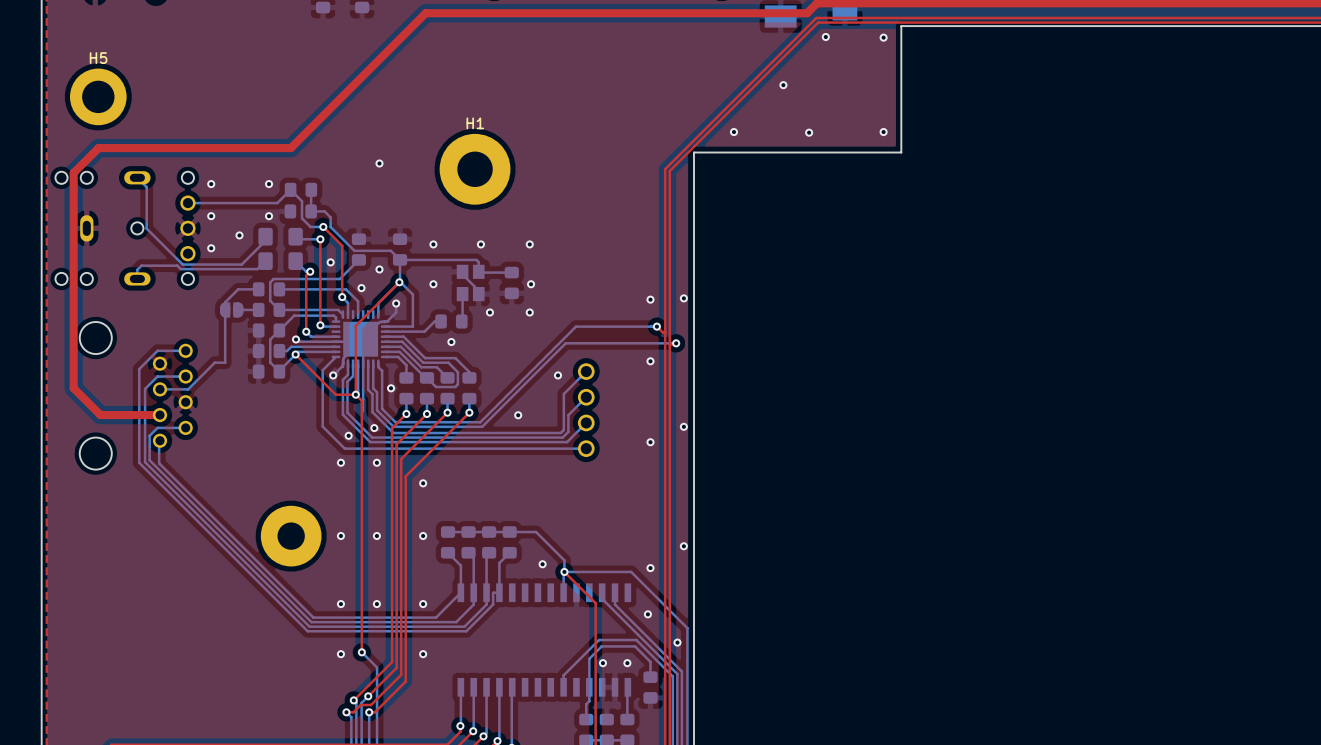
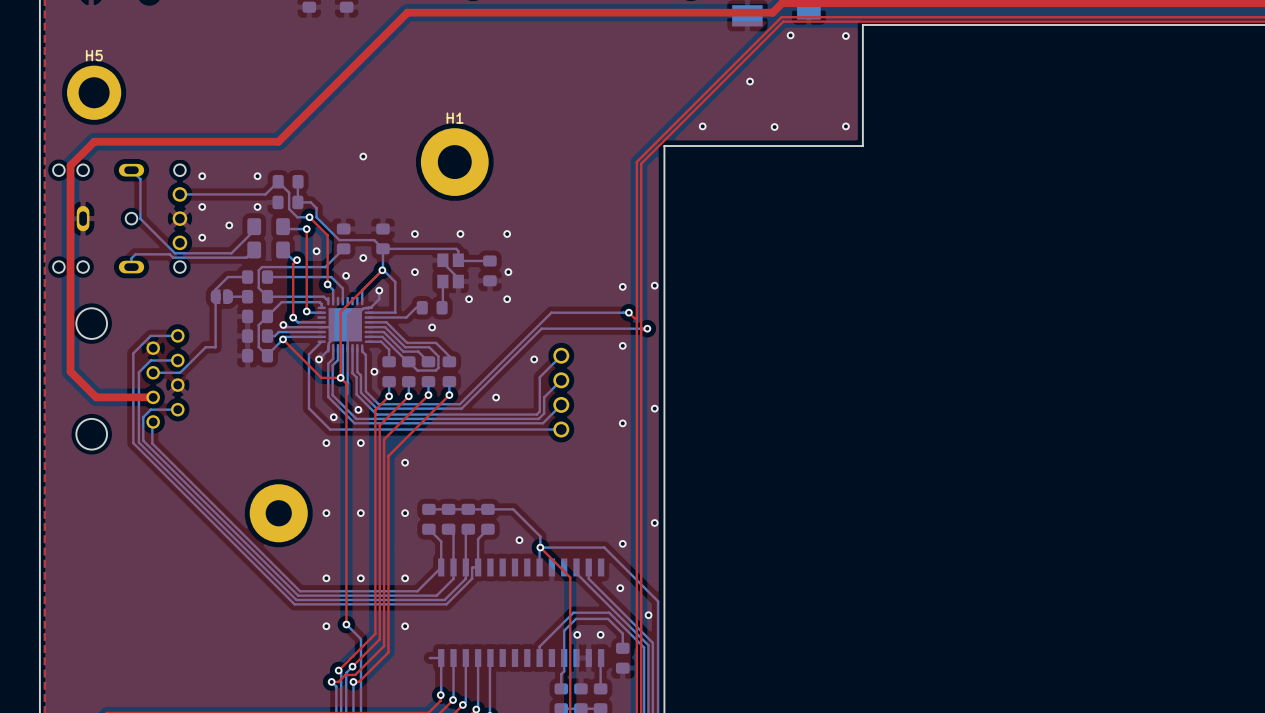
bottom track: none -> (429, 658) (441, 658)

